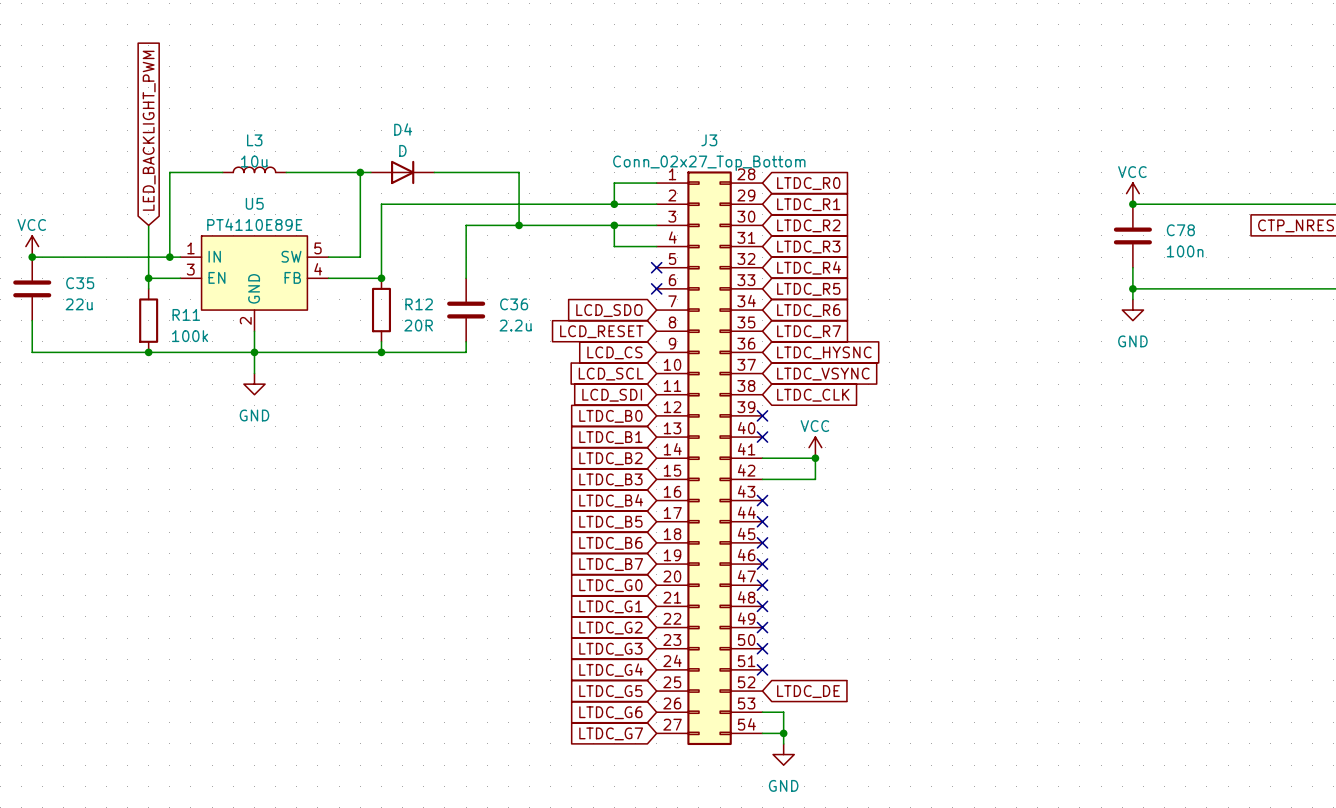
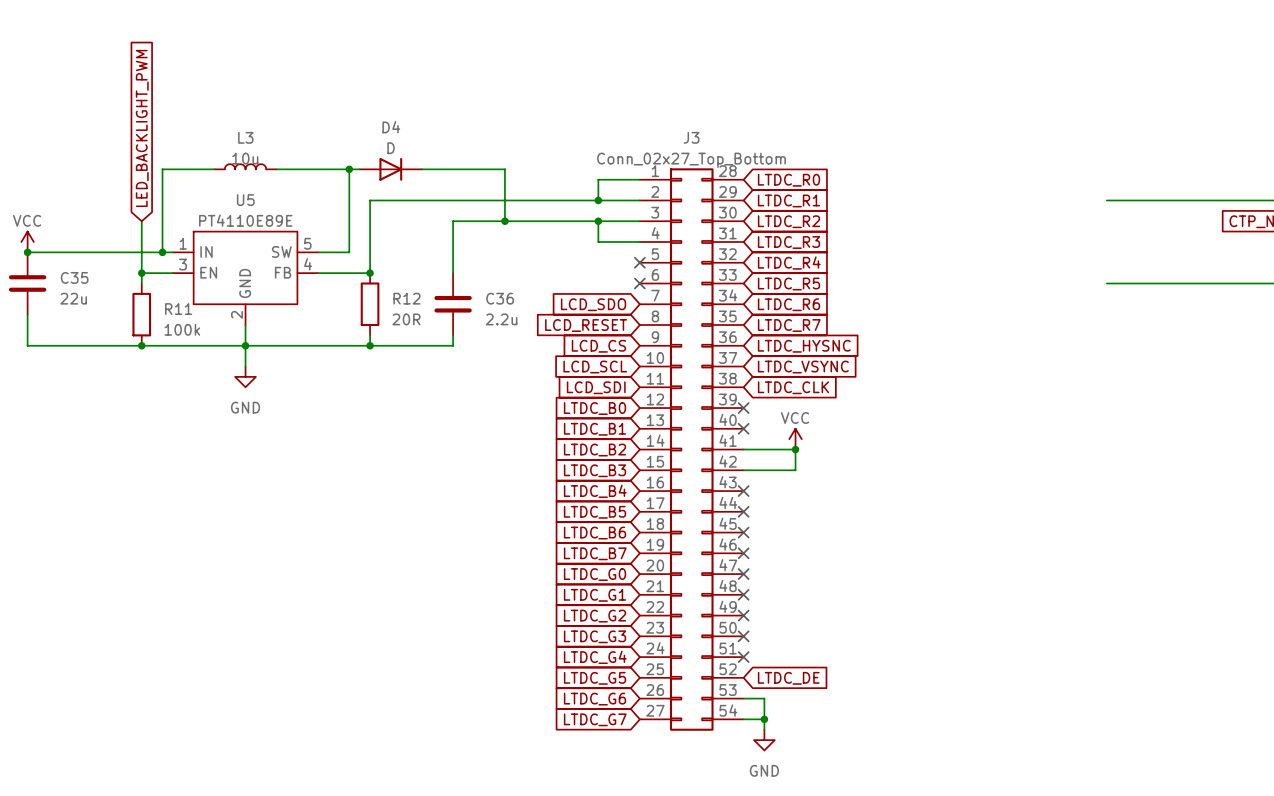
power symbol: VCC (1132, 193) -> none
junction: (1132, 204) -> none
C78: 100n (1132, 235) -> none
wire: (1132, 267) (1132, 299) -> none
junction: (1132, 288) -> none
power symbol: GND (1132, 310) -> none

